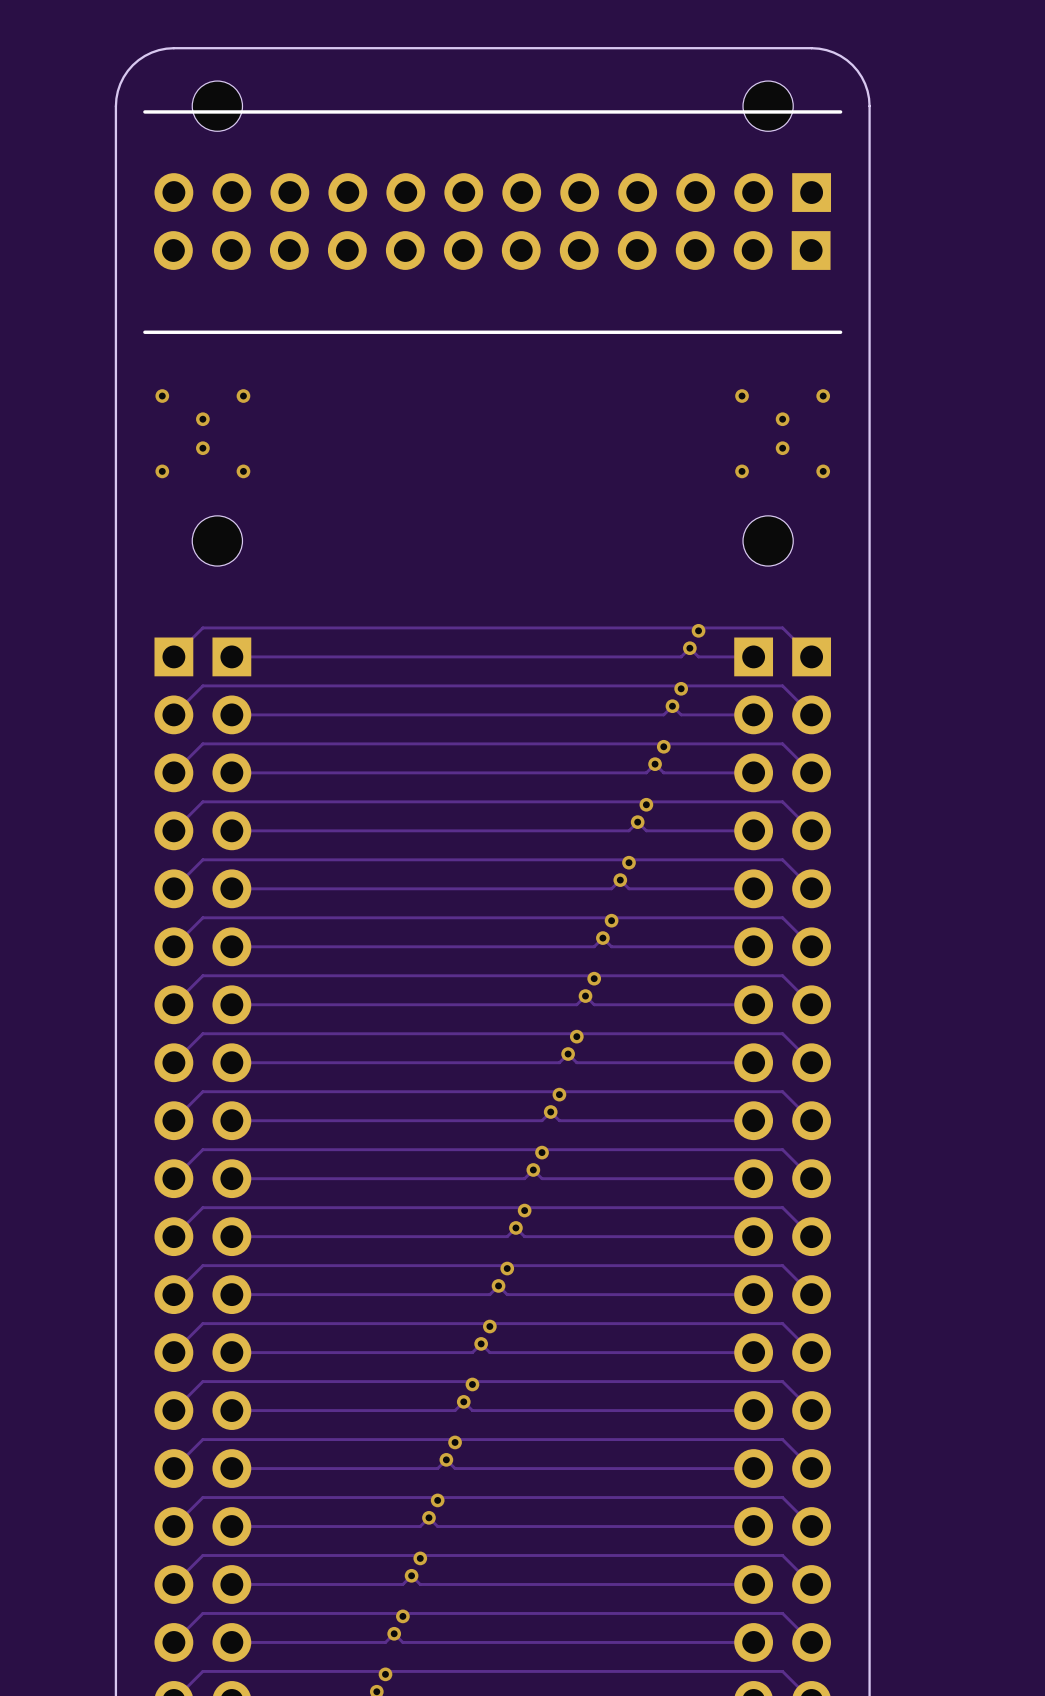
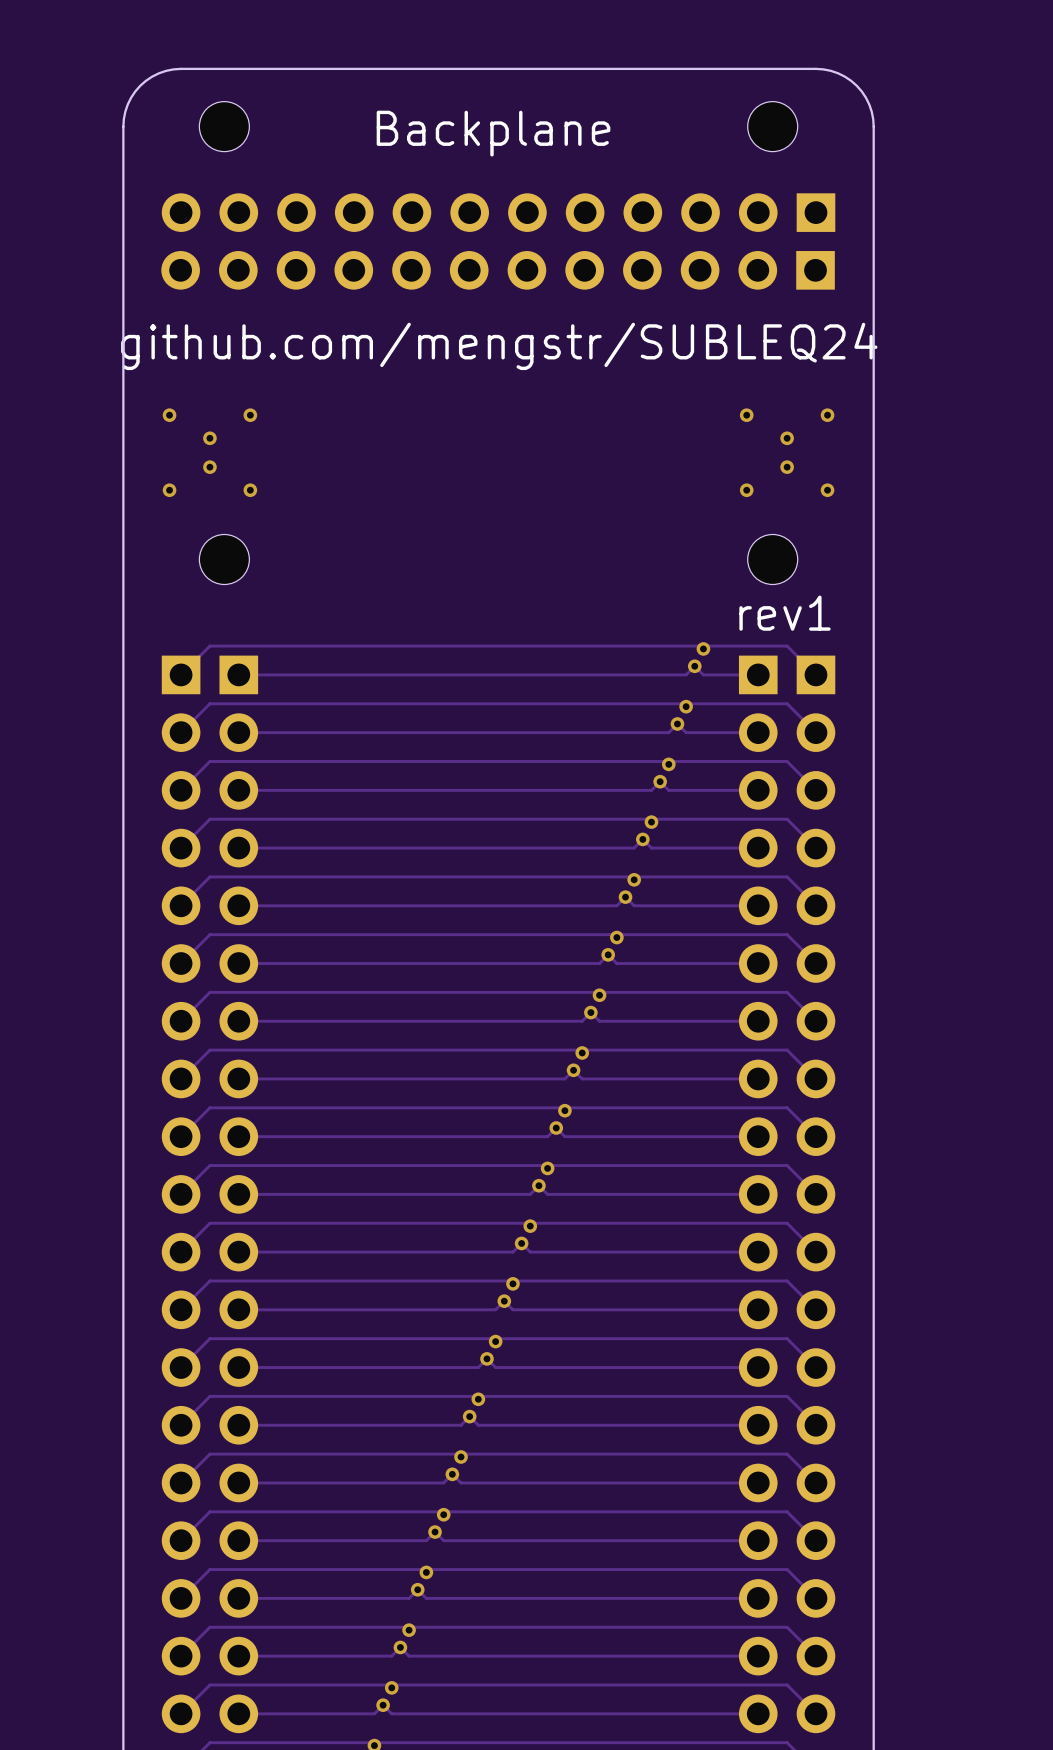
line: (840, 111) (144, 111) -> none
text: none -> Backplane (493, 133)
text: none -> github.com/mengstr/SUBLEQ24 (499, 346)
line: (840, 332) (144, 332) -> none
text: none -> rev1 (784, 613)

